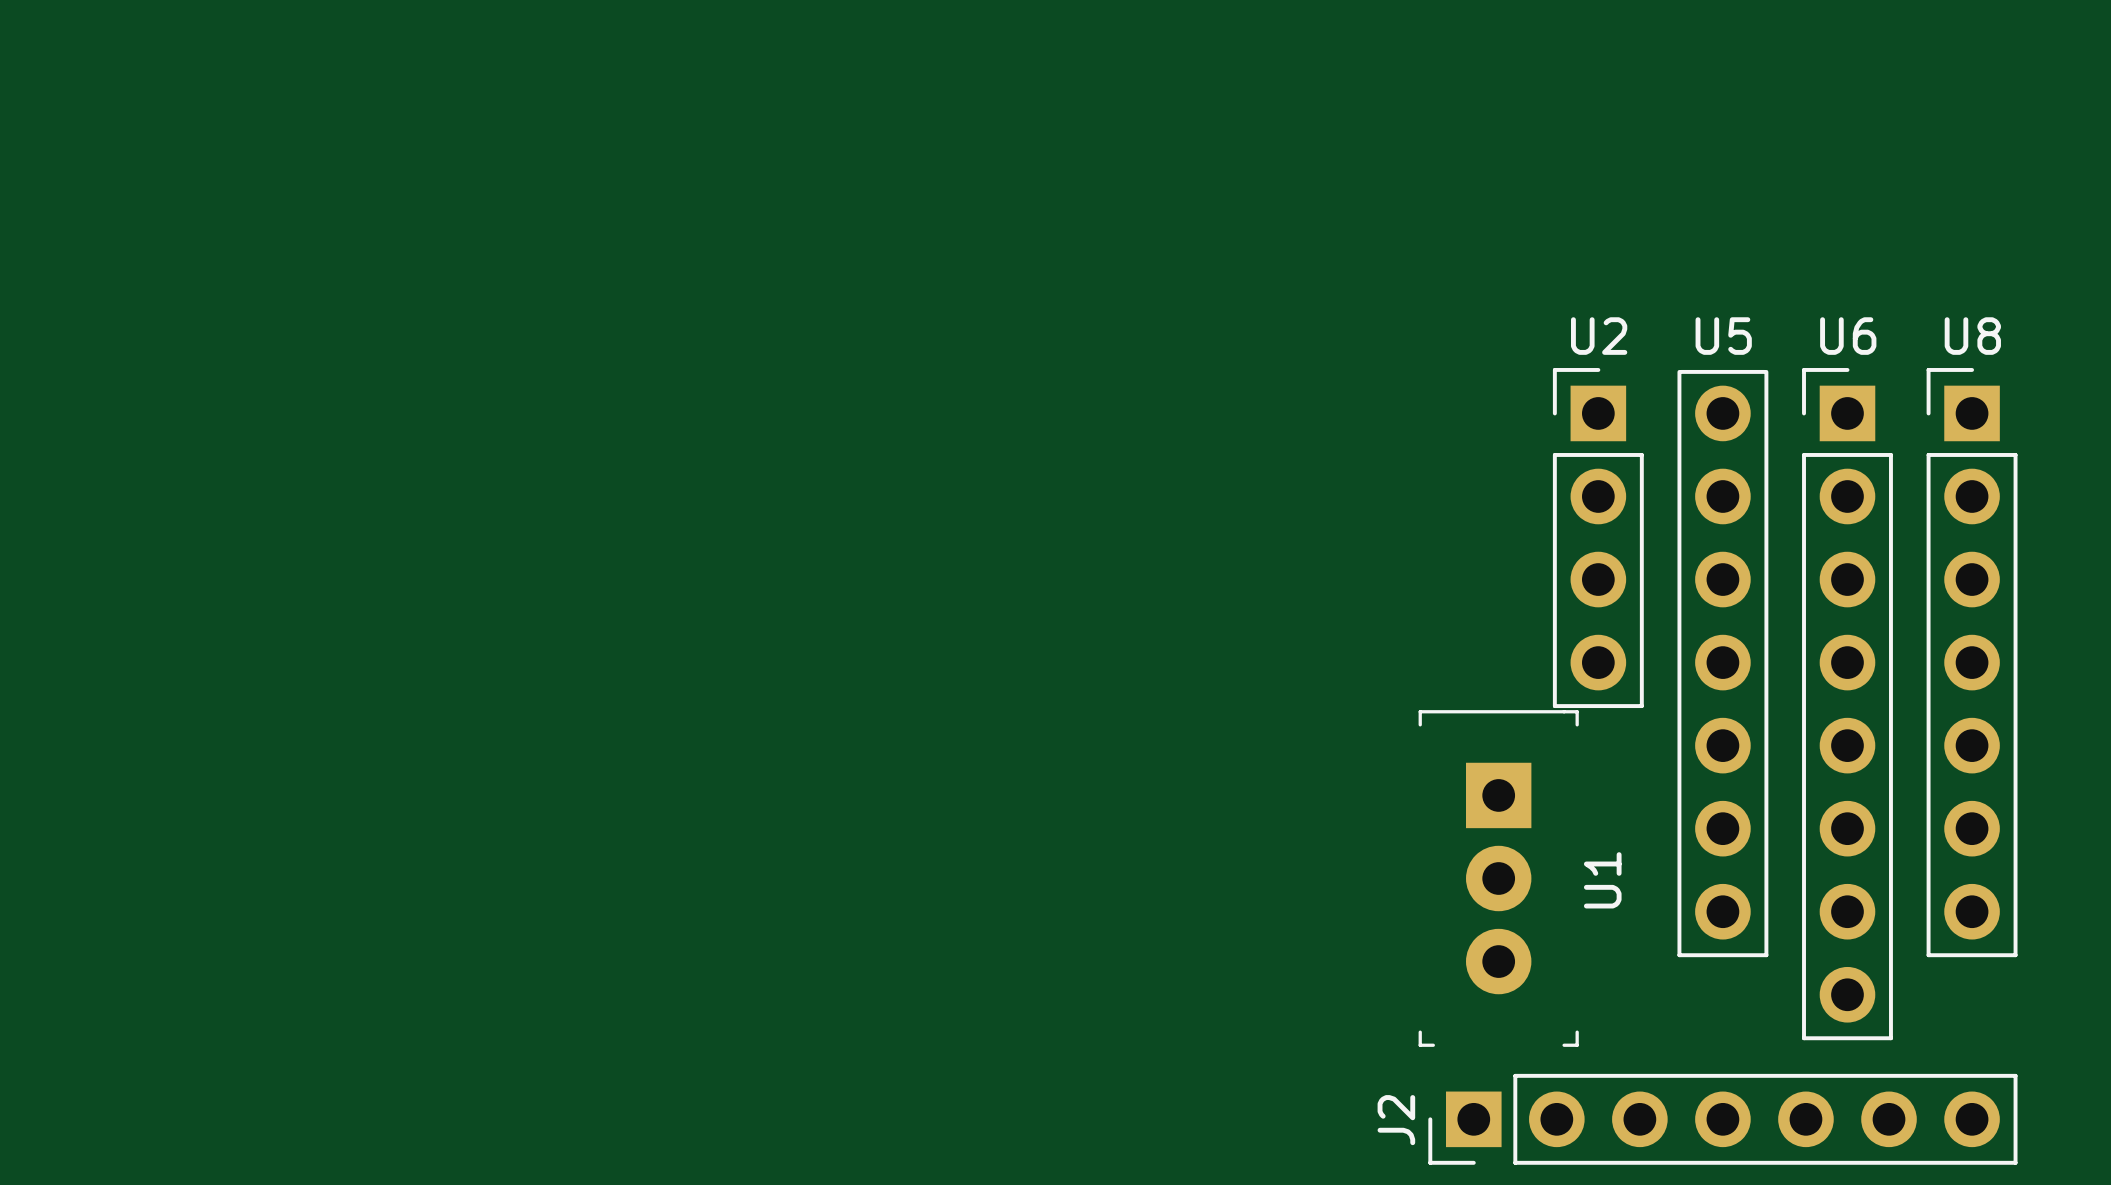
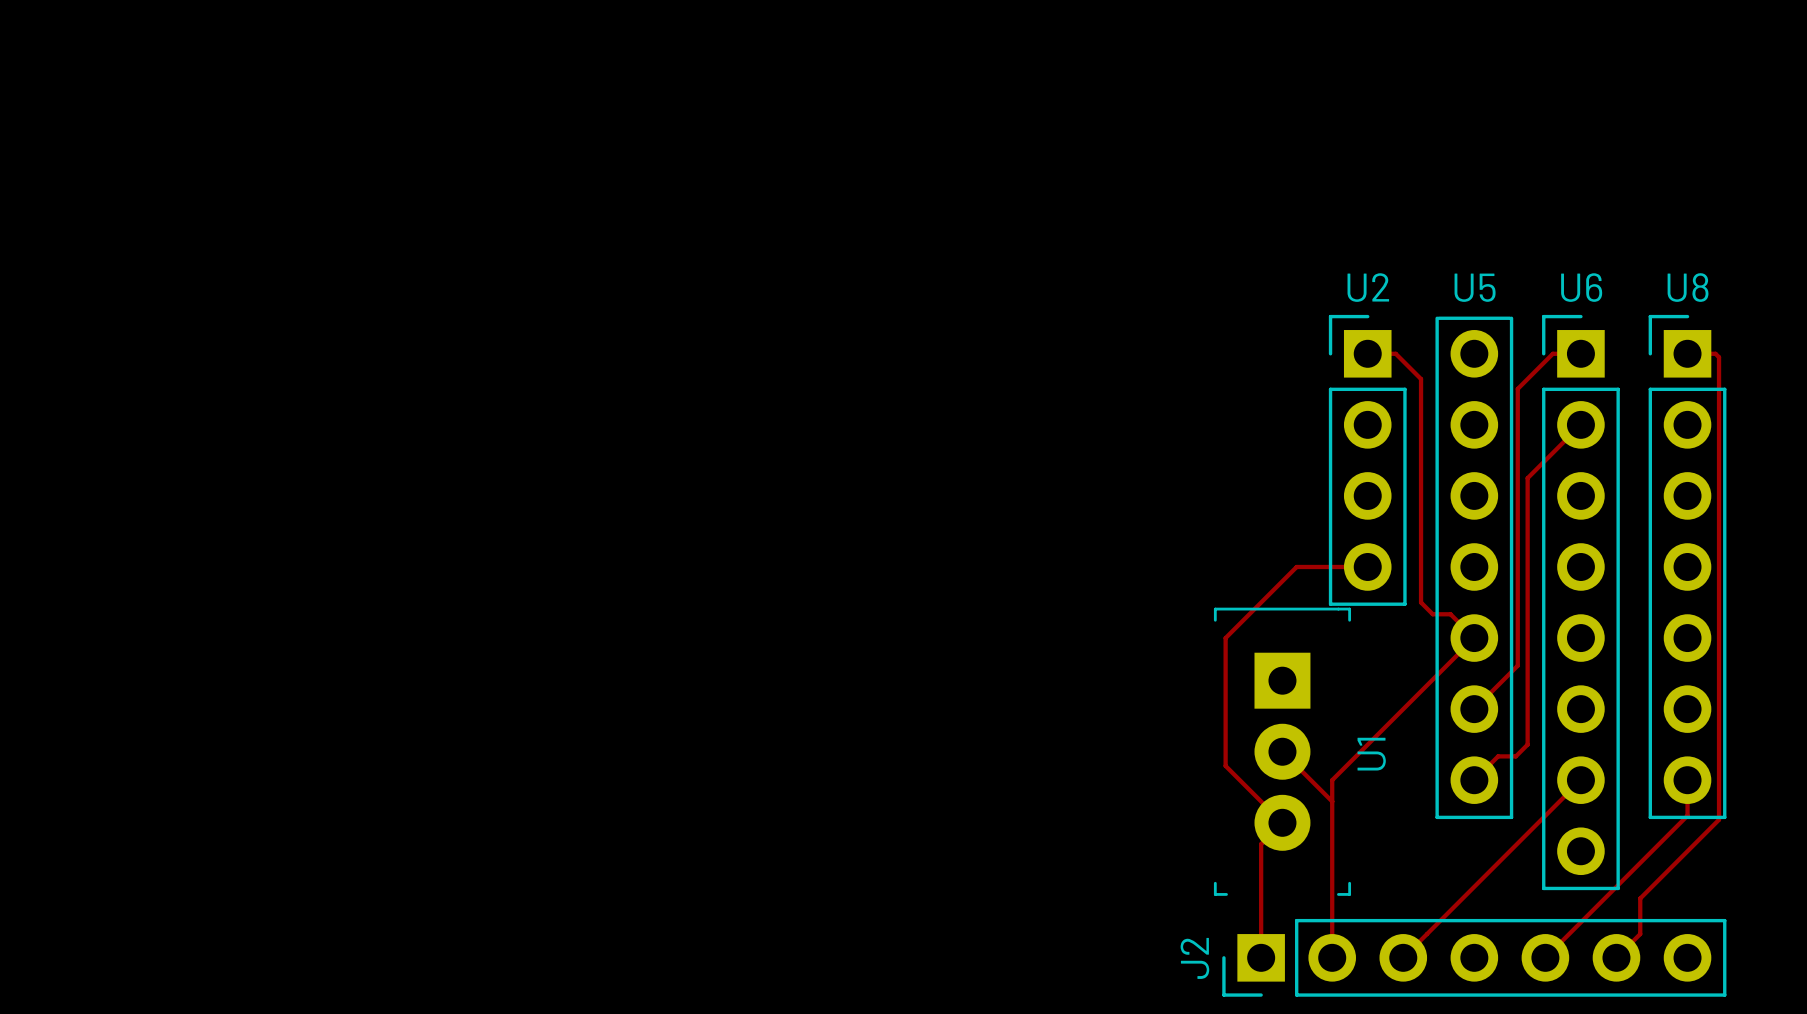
track: none -> (1367, 353) (1395, 353) (1421, 379) (1421, 602) (1432, 614) (1450, 614) (1474, 638) (1332, 780) (1332, 957)
track: none -> (1580, 353) (1552, 353) (1517, 388) (1517, 665) (1474, 709)
track: none -> (1687, 353) (1715, 353) (1719, 357) (1719, 819) (1640, 898) (1640, 934) (1616, 957)
track: none -> (1580, 424) (1527, 478) (1527, 744) (1515, 756) (1498, 756) (1474, 780)
track: none -> (1367, 566) (1296, 566) (1225, 638) (1225, 765) (1282, 822) (1261, 844) (1261, 957)
track: none -> (1282, 751) (1332, 801)
track: none -> (1580, 780) (1403, 957)
track: none -> (1687, 780) (1687, 815) (1545, 957)

